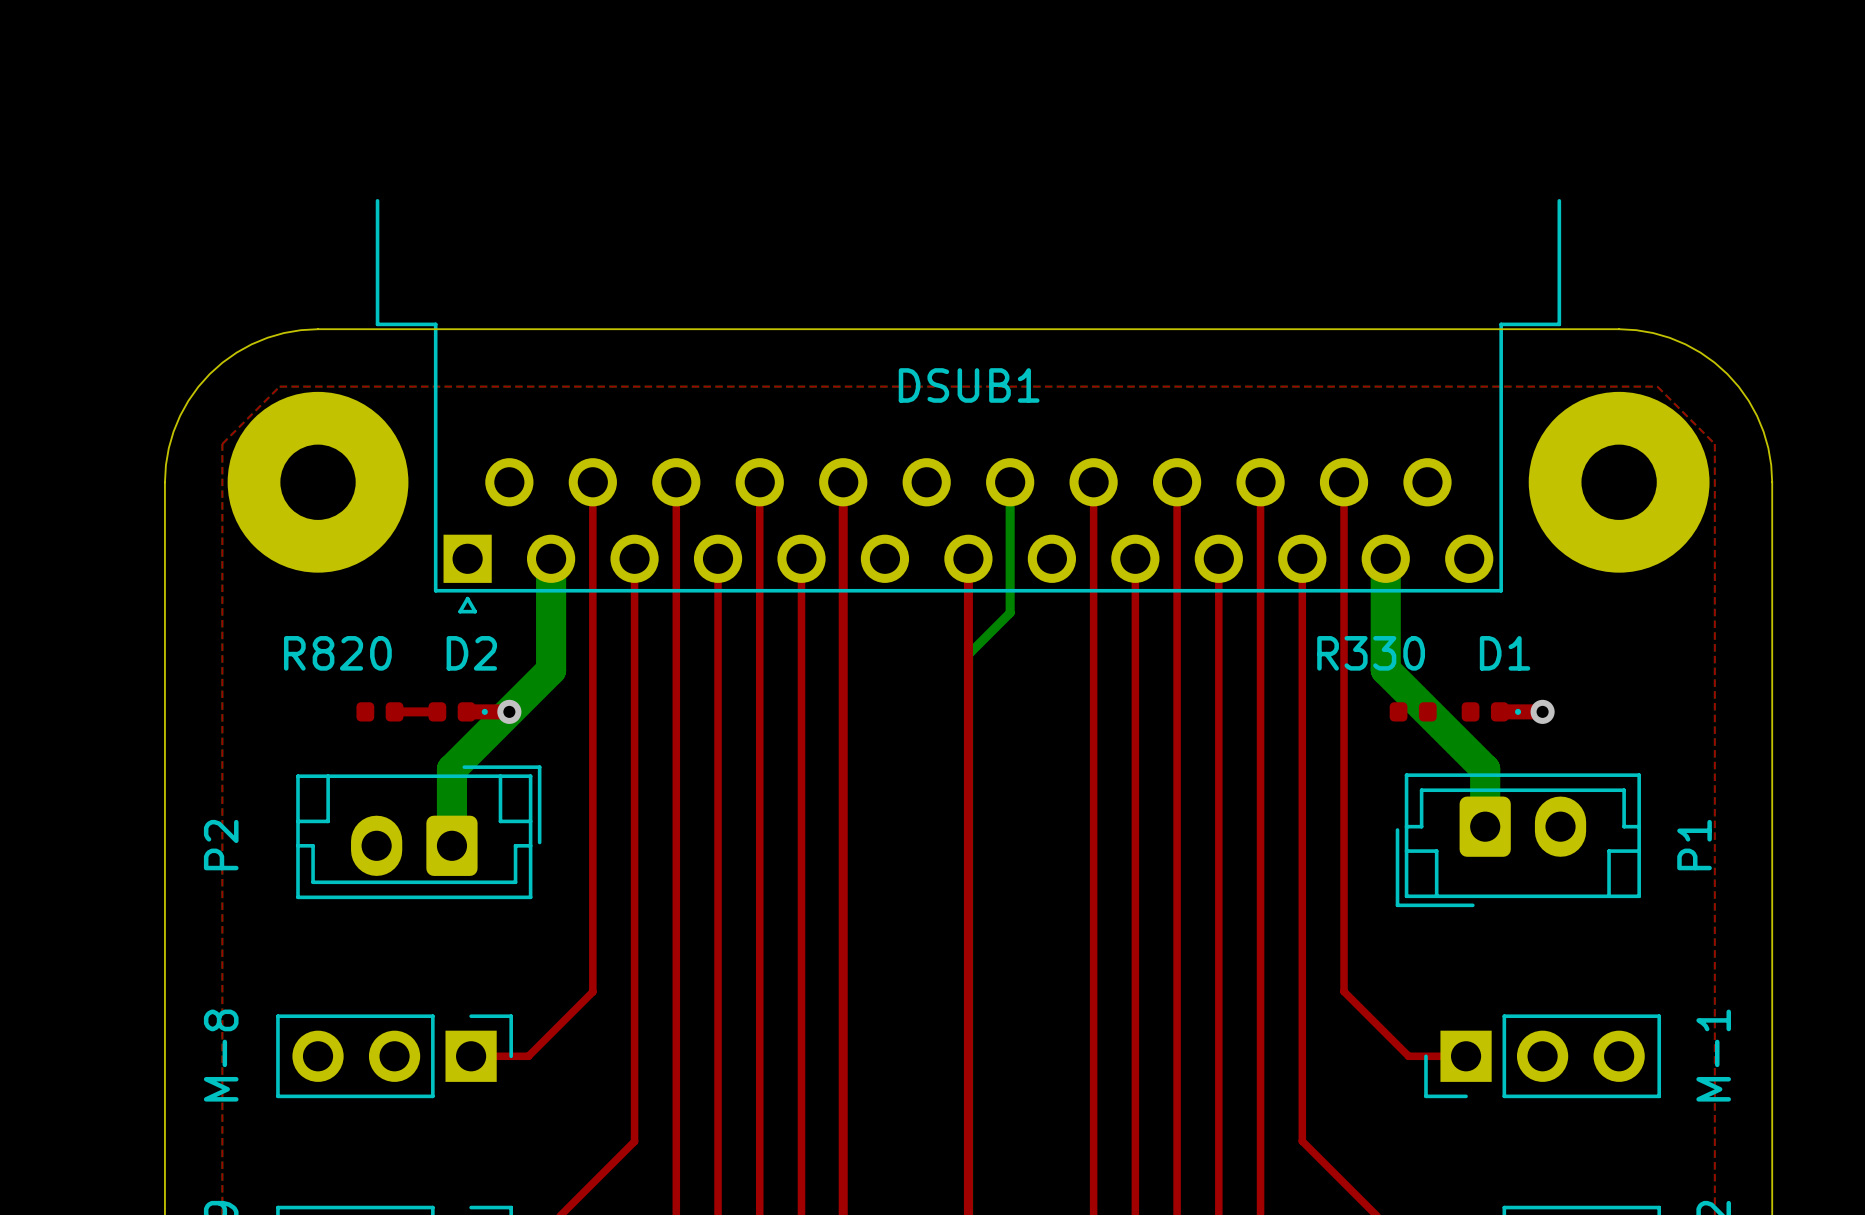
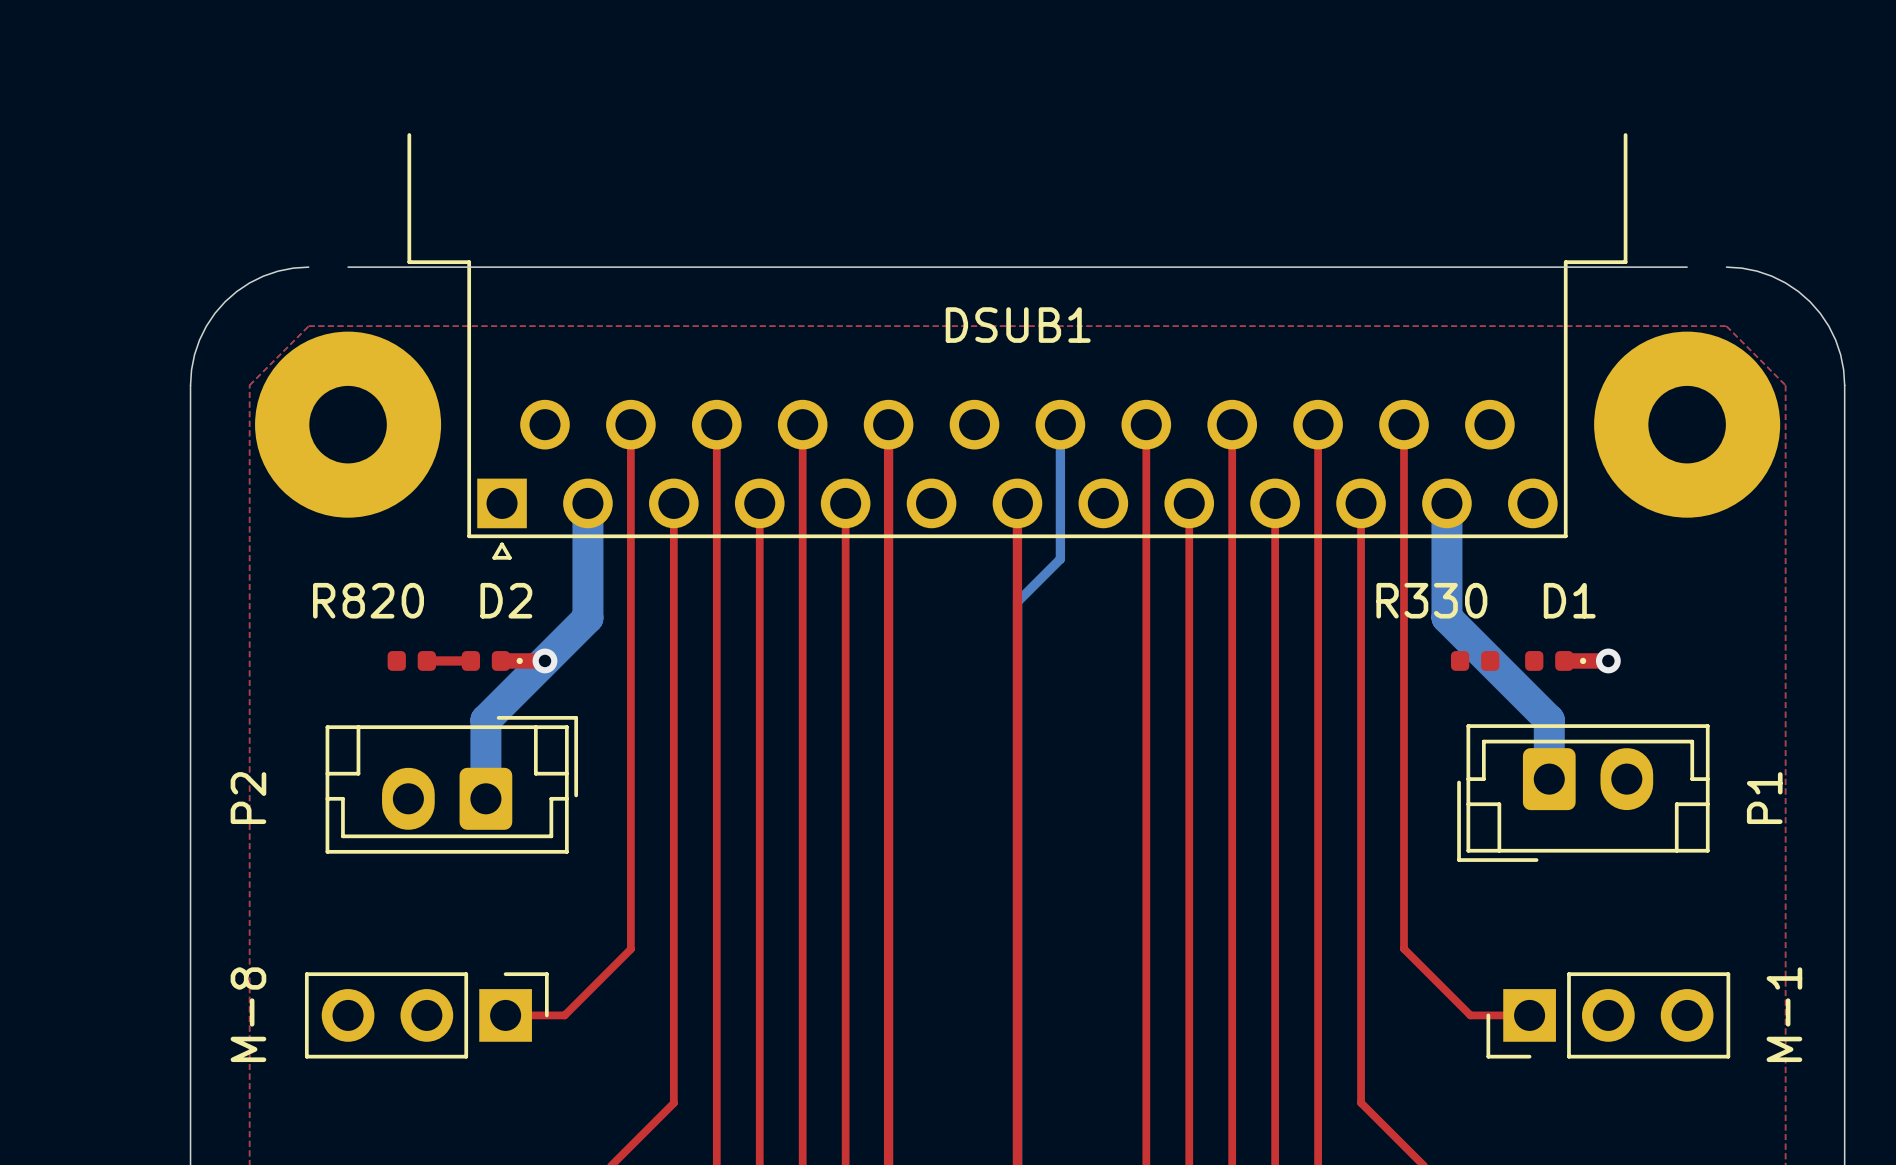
board edge: (318, 329) (283, 333) (251, 344) (236, 352) (209, 374) (188, 400) (180, 415) (168, 448) (164, 482) -> (308, 267) (293, 268) (263, 276) (236, 291) (214, 313) (199, 340) (194, 354) (190, 385) (190, 424)
board edge: (1619, 329) (1653, 333) (1669, 337) (1700, 352) (1727, 374) (1748, 400) (1757, 415) (1768, 448) (1772, 482) -> (1726, 267) (1741, 268) (1771, 276) (1798, 291) (1820, 313) (1828, 326) (1840, 354) (1844, 385) (1844, 424)

